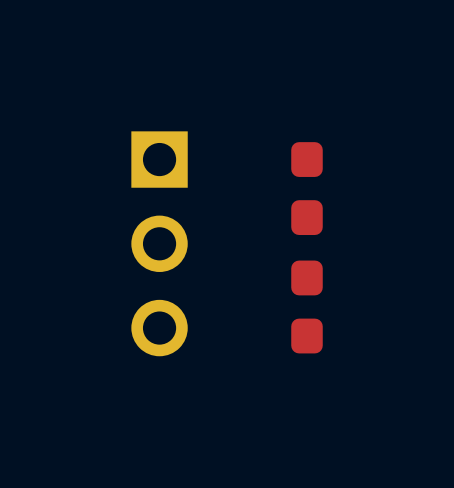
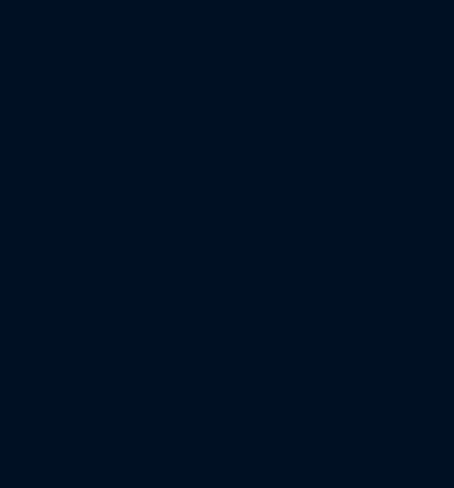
part: (306, 188) -> none
part: (159, 243) -> none
part: (306, 306) -> none

